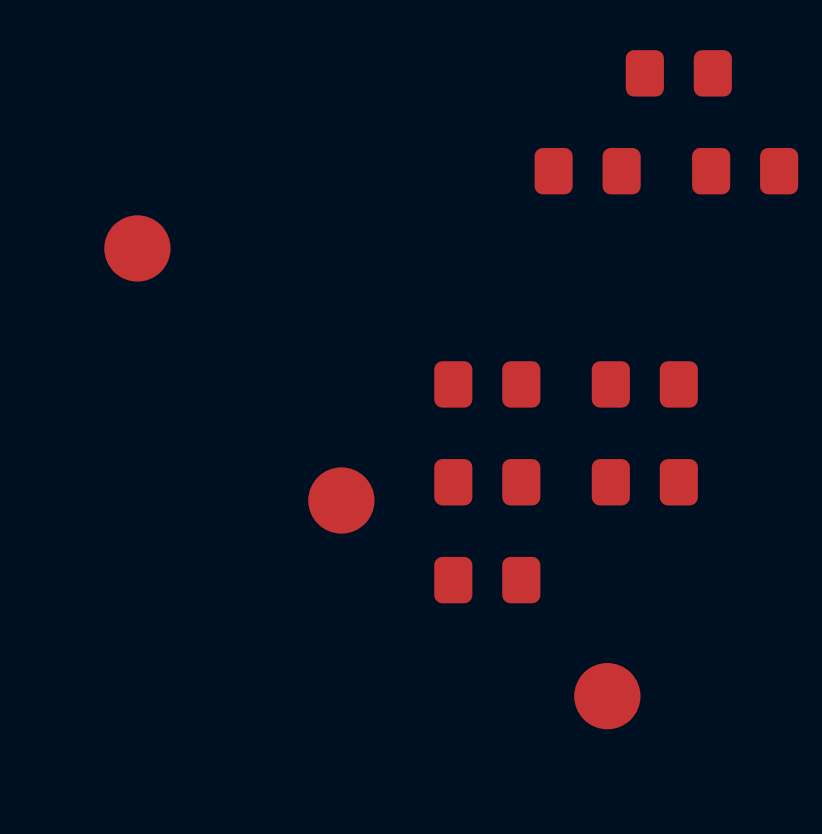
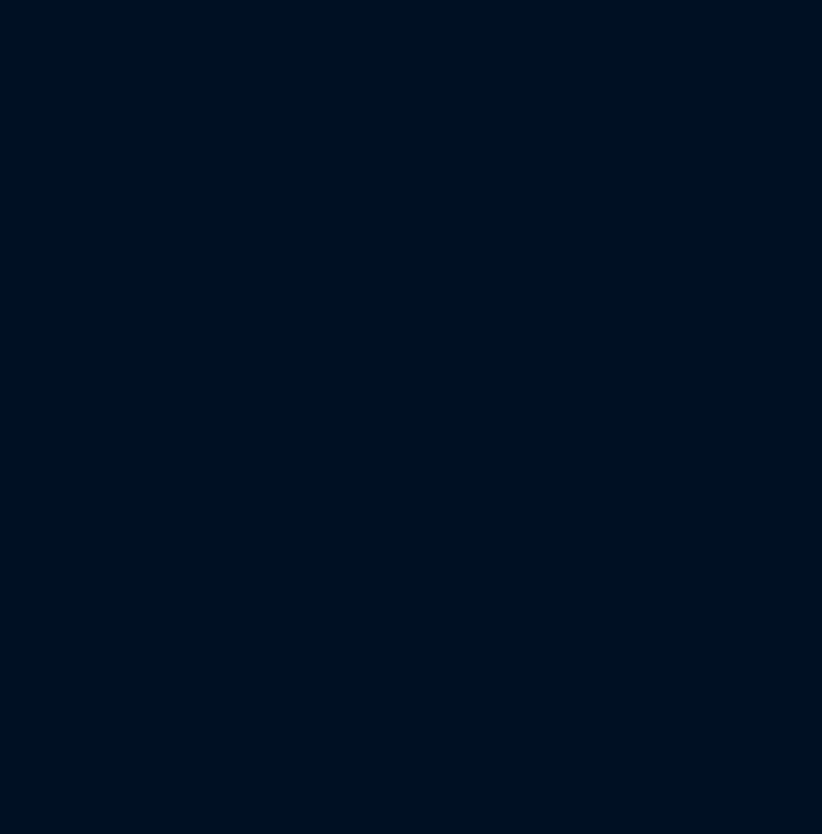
part: (678, 73) -> none
part: (587, 171) -> none
part: (745, 171) -> none
part: (137, 248) -> none
part: (487, 384) -> none
part: (644, 384) -> none
part: (487, 482) -> none
part: (644, 482) -> none
part: (341, 500) -> none
part: (487, 580) -> none
part: (607, 696) -> none

